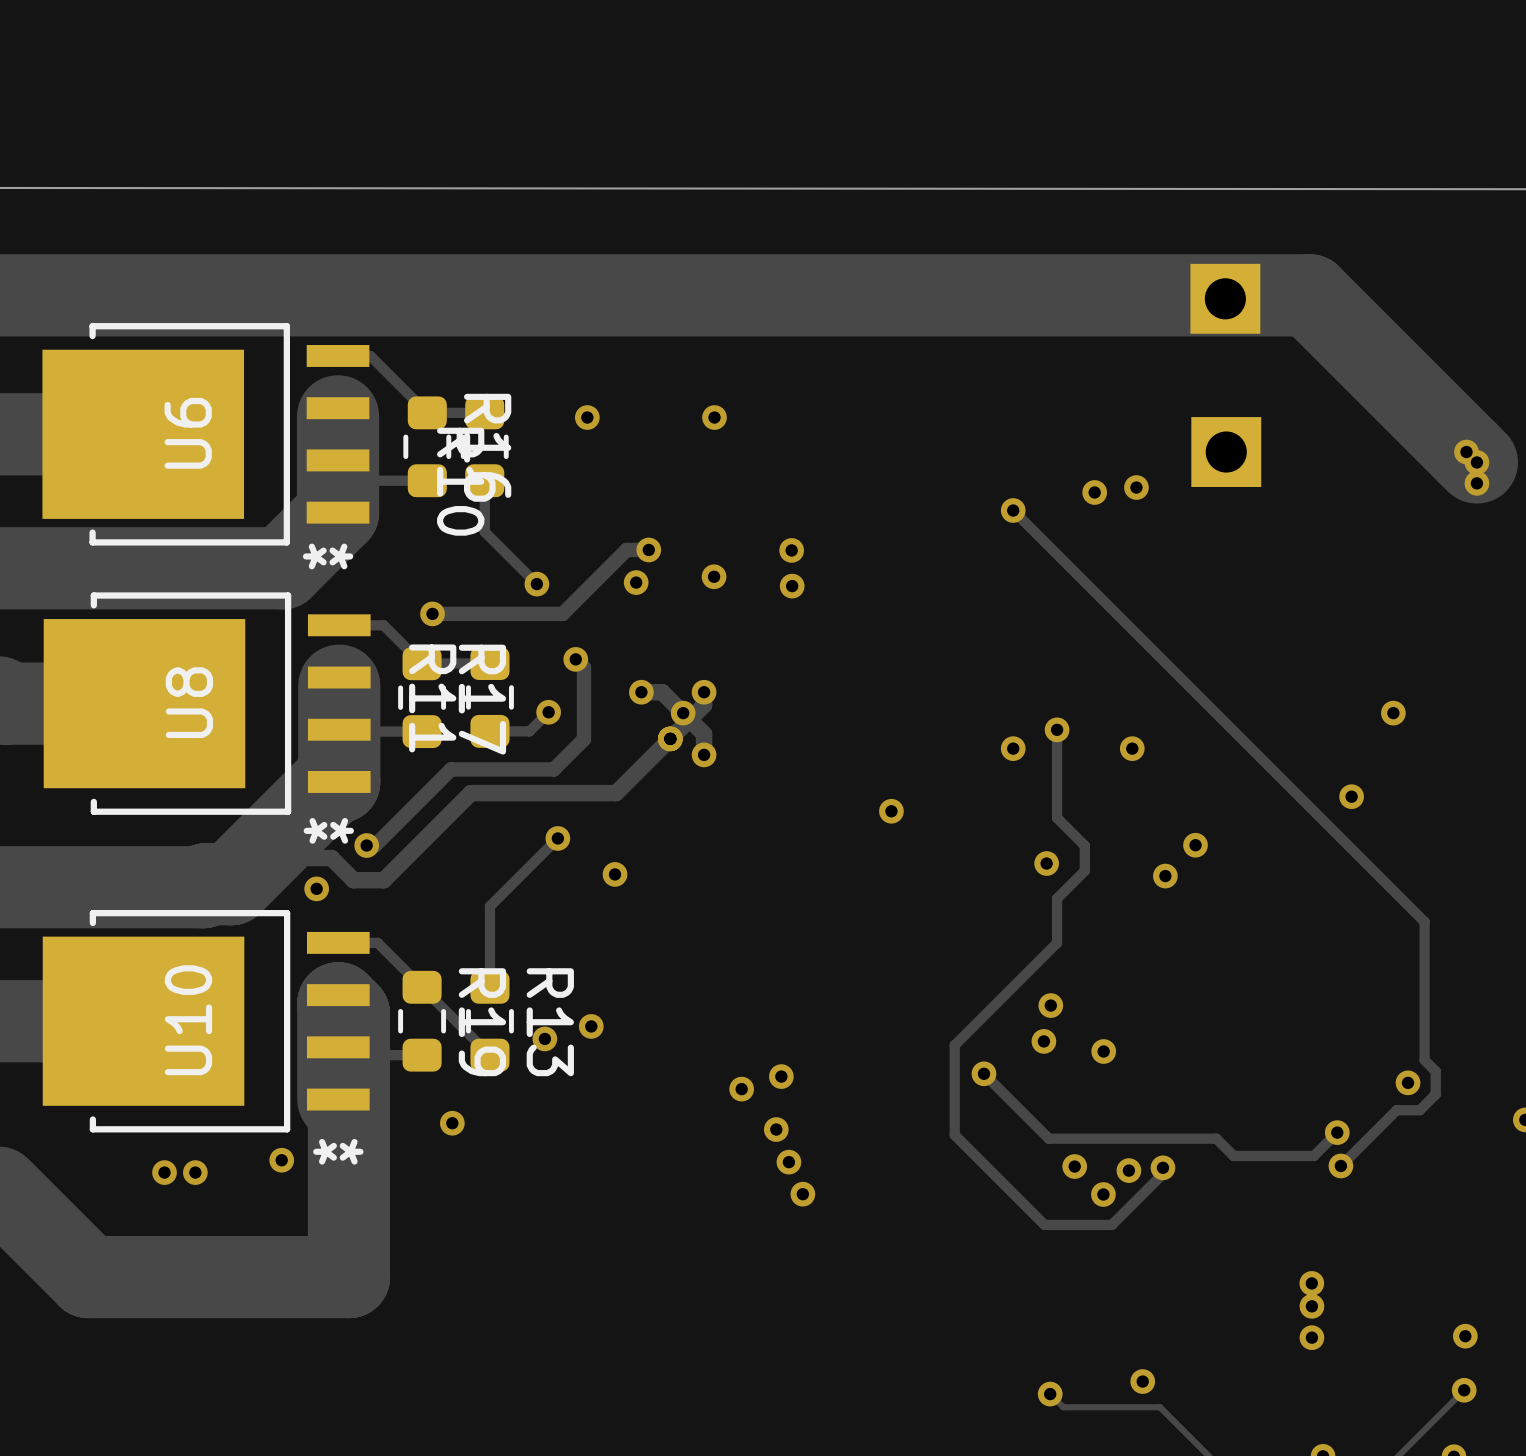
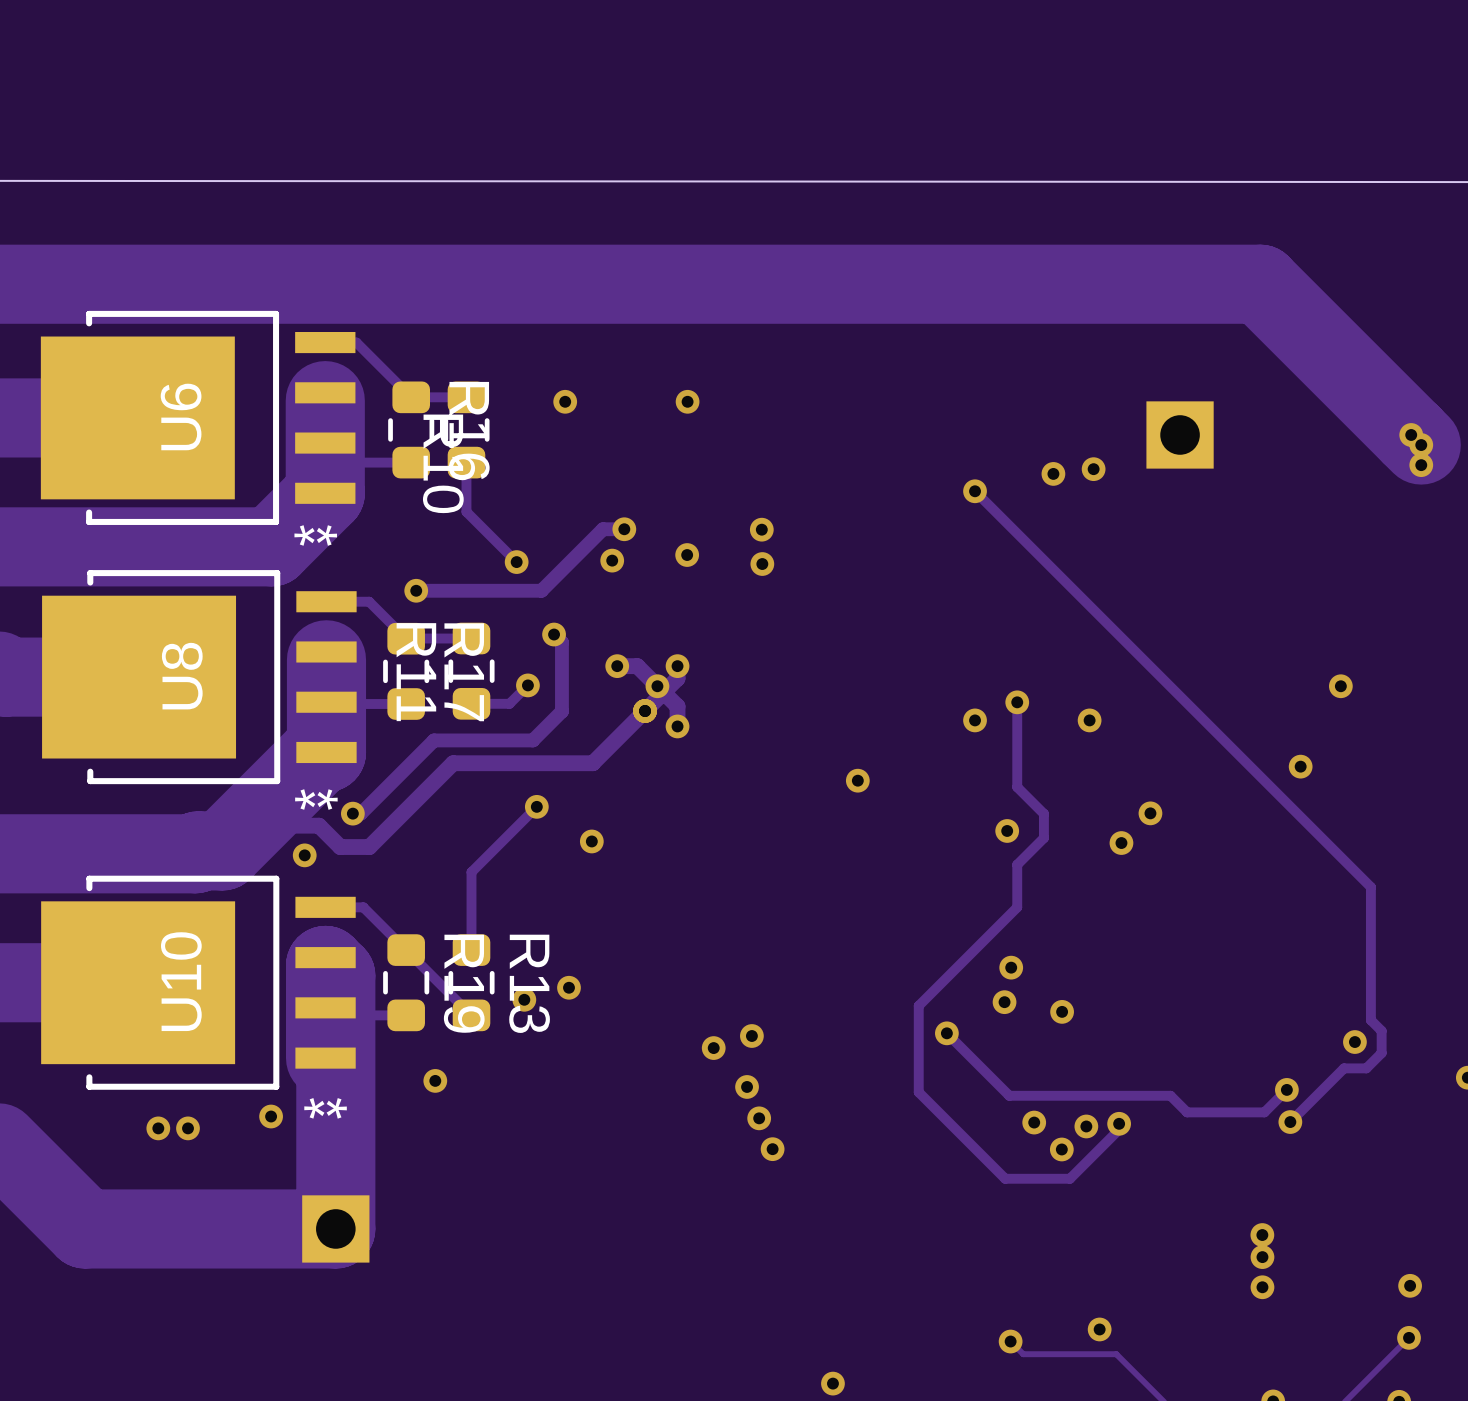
part: (1225, 298) -> none
part: none -> (335, 1228)
via: none -> (832, 1383)

